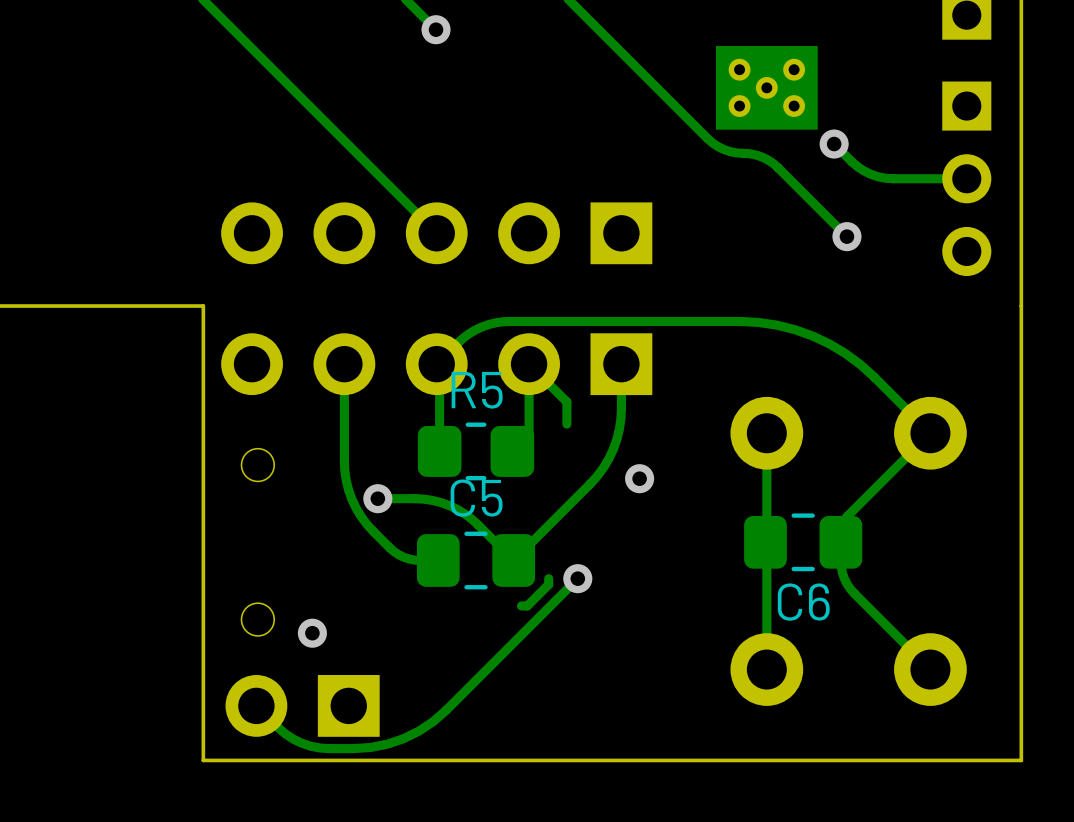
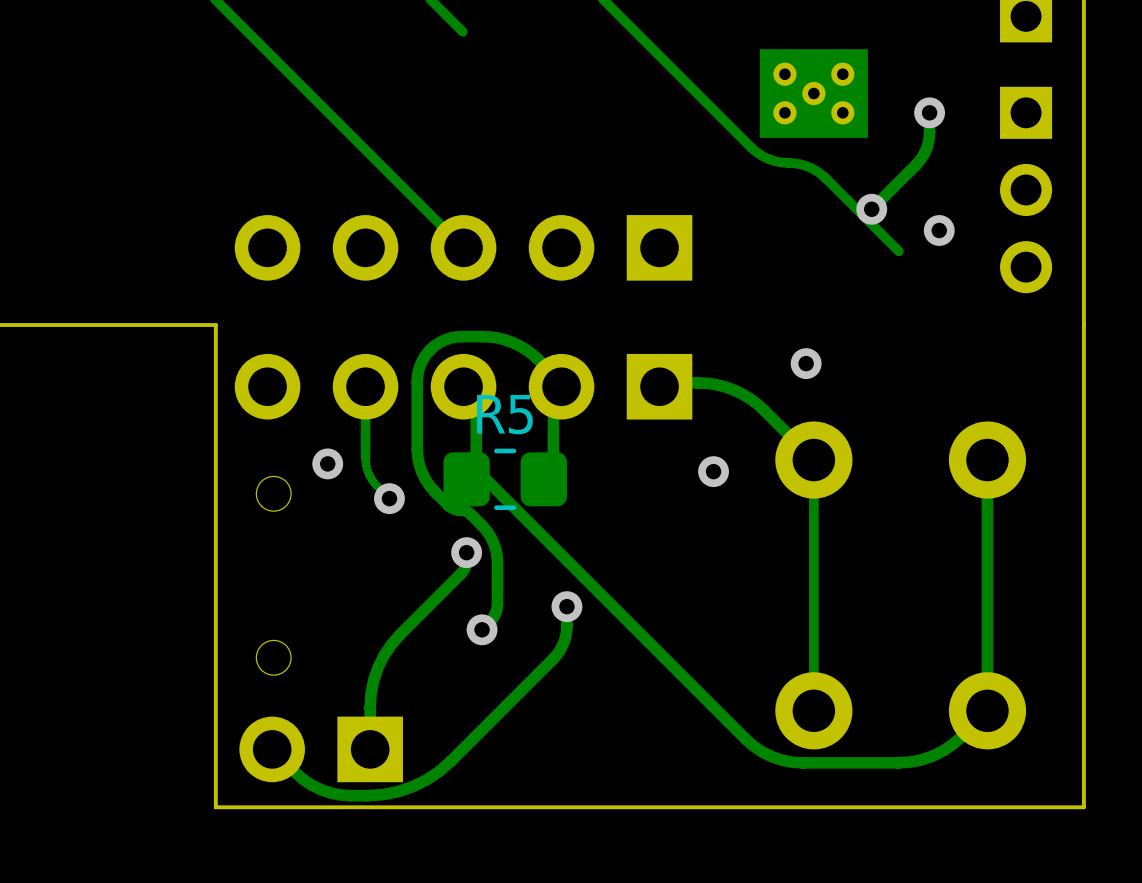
via: (436, 29) -> none
track: none -> (929, 112) (928, 141) (921, 157) (871, 209)
via: none -> (929, 112)
track: (834, 144) (857, 166) (878, 176) (893, 178) (966, 178) -> none
via: (834, 144) -> none
via: none -> (871, 209)
via: none -> (939, 230)
via: (846, 236) -> none
via: none -> (806, 363)
track: none -> (463, 382) (472, 392) (476, 402) (476, 469) (745, 739) (762, 752) (792, 762) (898, 762) (921, 759) (943, 750) (952, 744) (961, 736) (975, 718) (984, 697) (987, 674) (987, 460)
track: none -> (659, 382) (707, 383) (725, 386) (742, 393) (763, 410) (813, 460)
track: (621, 364) (620, 418) (616, 439) (608, 458) (590, 484) (513, 560) (471, 518) (449, 505) (423, 499) (377, 498) -> none
track: (566, 424) (566, 401) (529, 364) (529, 434) (512, 451) -> none
track: (344, 431) (346, 480) (351, 499) (361, 516) (373, 531) (398, 554) (414, 560) (438, 560) -> (365, 457) (371, 478) (389, 498)
via: none -> (327, 463)
track: none -> (553, 469) (553, 396) (559, 382) (538, 359) (519, 345) (505, 340) (490, 336) (450, 338) (439, 342) (430, 349) (423, 358) (417, 375) (417, 456) (425, 479) (435, 492) (451, 508) (470, 513) (485, 529) (493, 542) (497, 557) (497, 606) (493, 616) (482, 629)
track: (439, 451) (439, 369) (437, 363) (463, 338) (488, 324) (509, 321) (739, 321) (776, 325) (812, 336) (829, 344) (860, 364) (930, 433) (847, 515) (842, 523) (840, 532) (841, 567) (847, 583) (930, 669) -> none
via position: (639, 478) -> (713, 471)
via position: (377, 498) -> (389, 498)
track: none -> (466, 552) (465, 565) (462, 571) (400, 634) (391, 644) (377, 667) (371, 693) (370, 749)
via: none -> (466, 552)
C6: (803, 542) -> none
C5: (476, 560) -> none
track: (548, 578) (548, 584) (527, 605) (521, 605) -> none
track: (577, 578) (446, 710) (419, 731) (403, 738) (370, 747) (329, 748) (301, 743) (277, 727) -> (566, 606) (566, 635) (556, 655) (451, 761) (426, 779) (398, 791) (382, 794) (351, 795) (320, 789) (295, 772)
via position: (577, 578) -> (566, 606)
via: none -> (482, 629)
via: (312, 633) -> none

